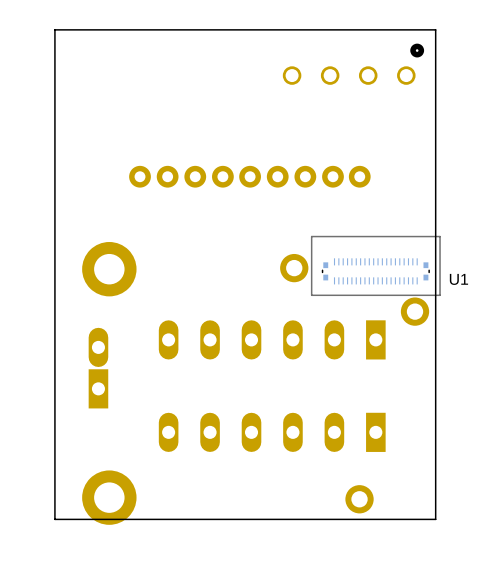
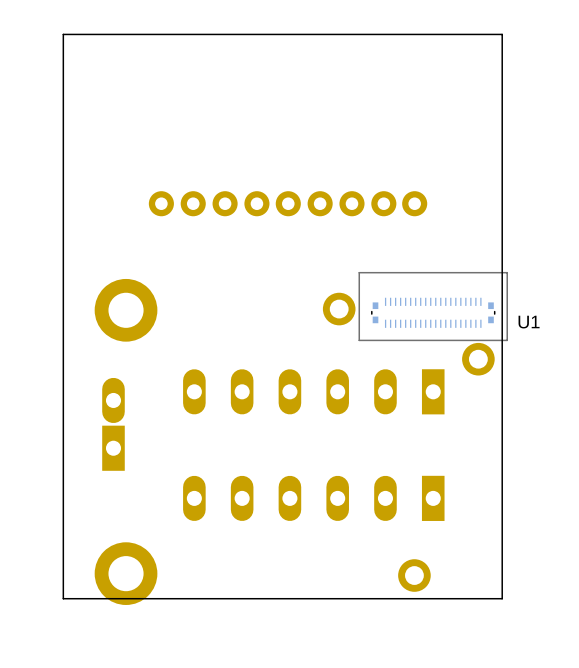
part: (353, 64) -> none

